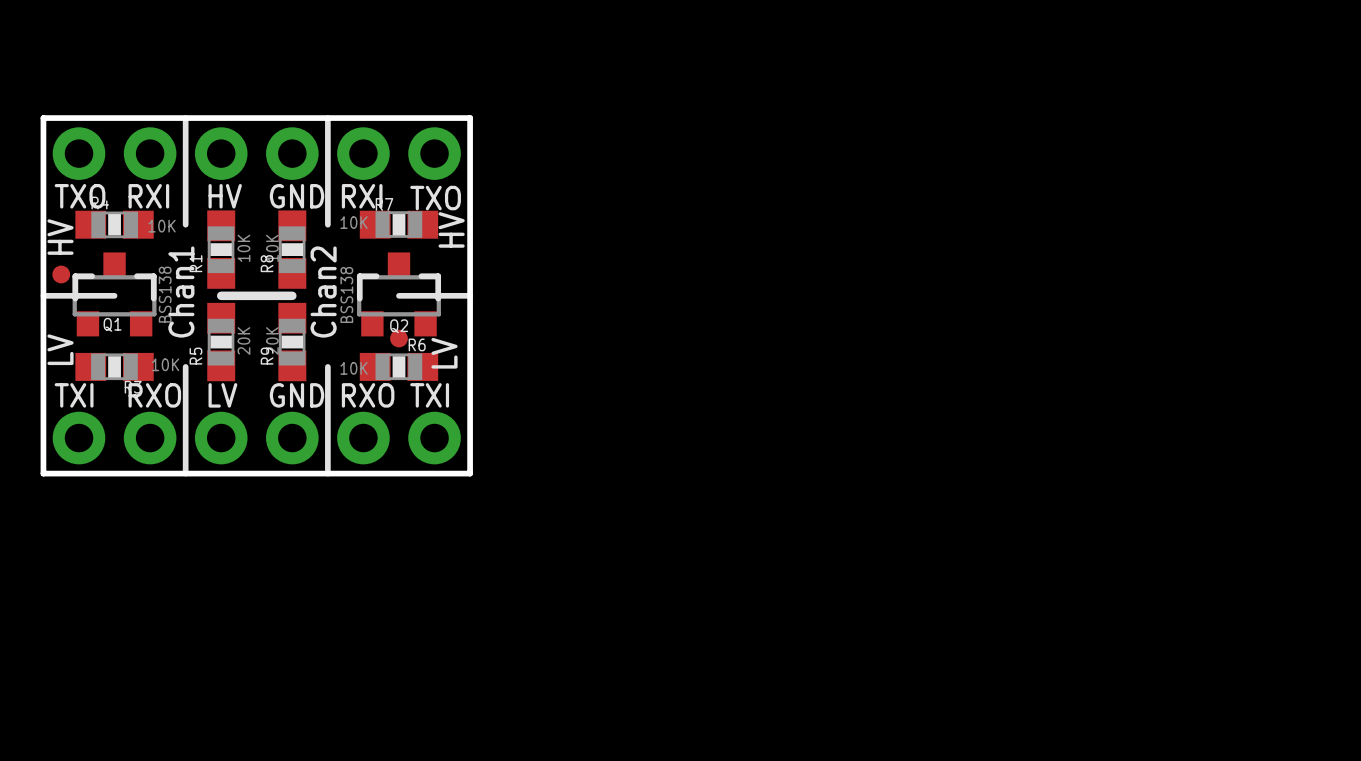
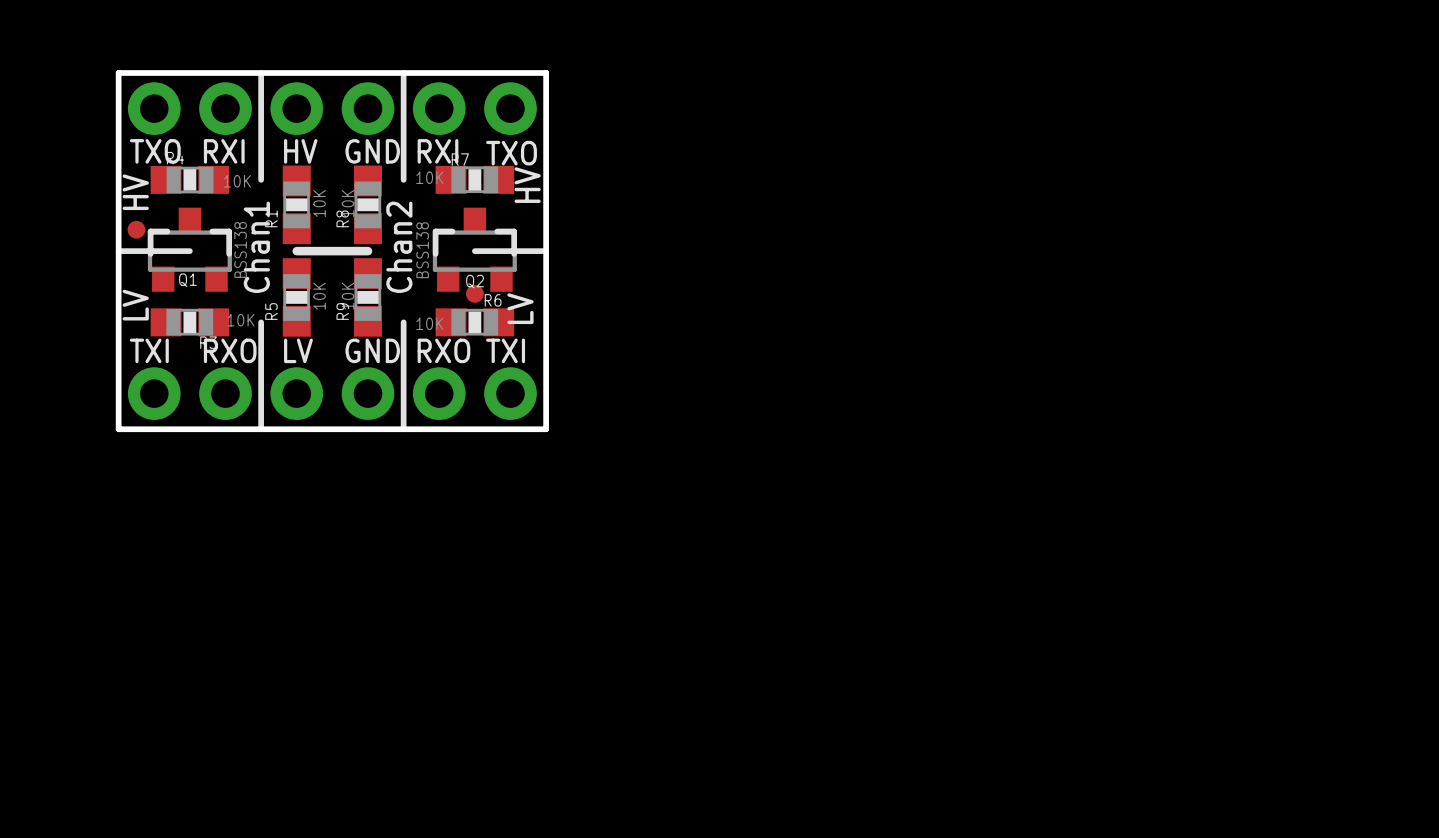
R5 value: 20K (243, 341) -> 10K (319, 296)
R9 value: 20K (272, 341) -> 10K (348, 296)

